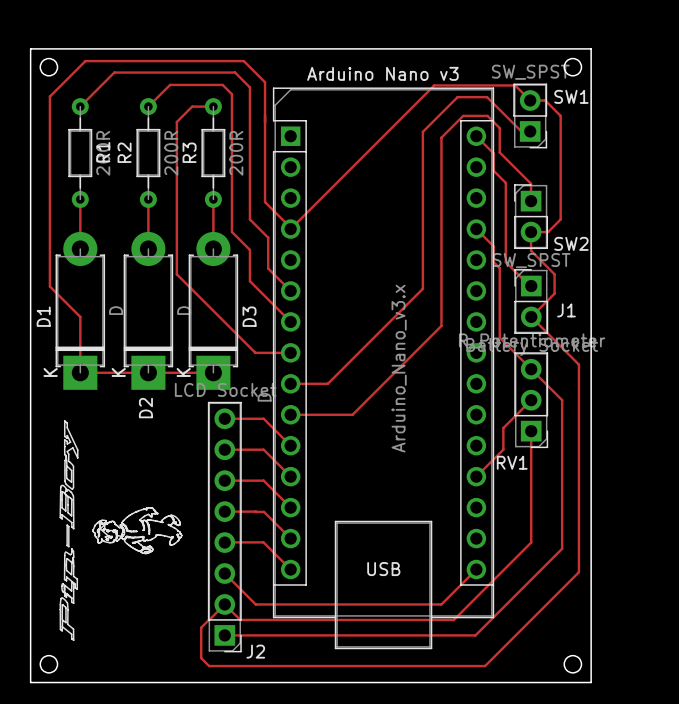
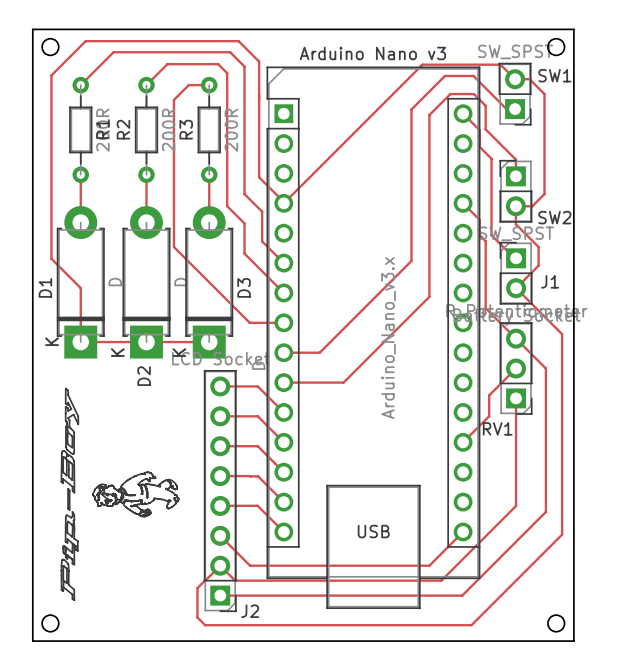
D2 footprint: [123, 231, 174, 390] -> [122, 206, 171, 359]
D3 footprint: [188, 231, 239, 390] -> [185, 206, 234, 359]

